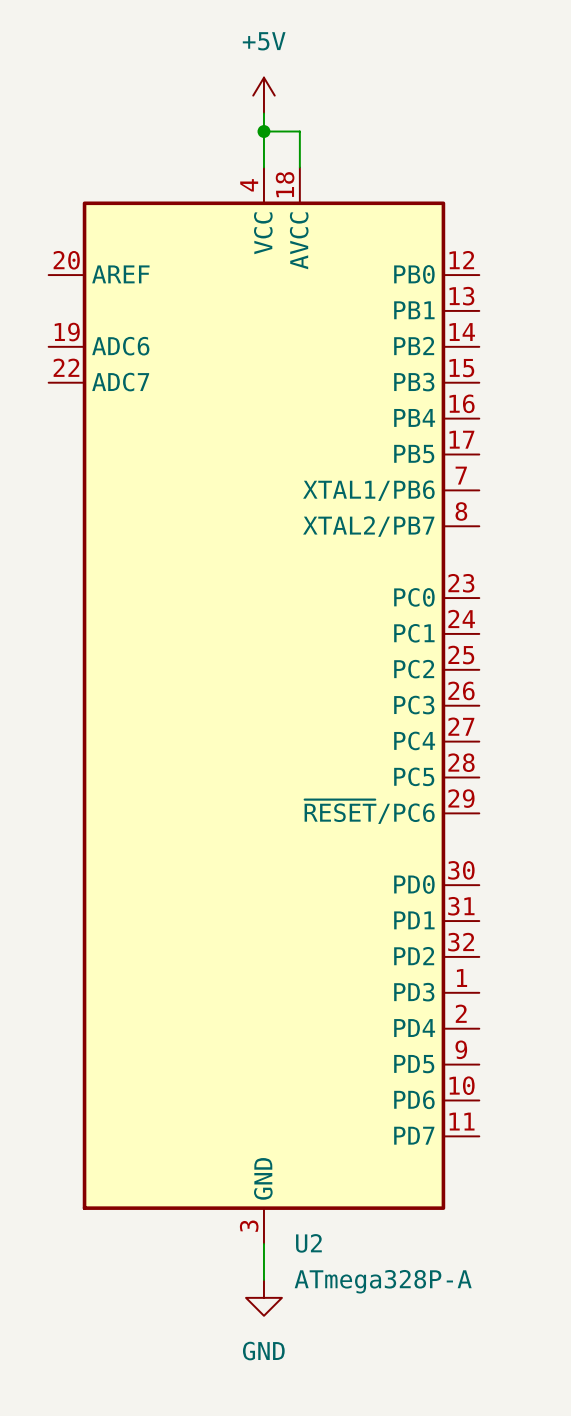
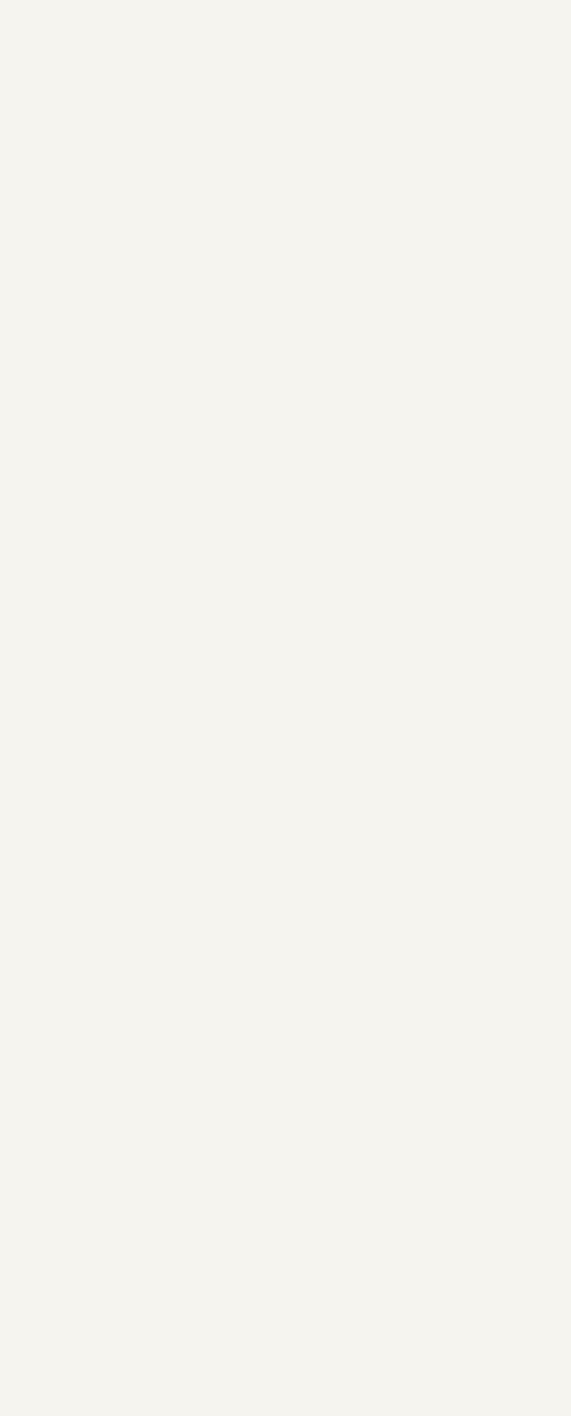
power symbol: +5V (263, 95) -> none
wire: (263, 113) (263, 167) -> none
wire: (263, 131) (299, 131) (299, 167) -> none
junction: (263, 131) -> none
U2: ATmega328P-A (263, 705) -> none
wire: (263, 1244) (263, 1279) -> none
power symbol: GND (263, 1297) -> none

